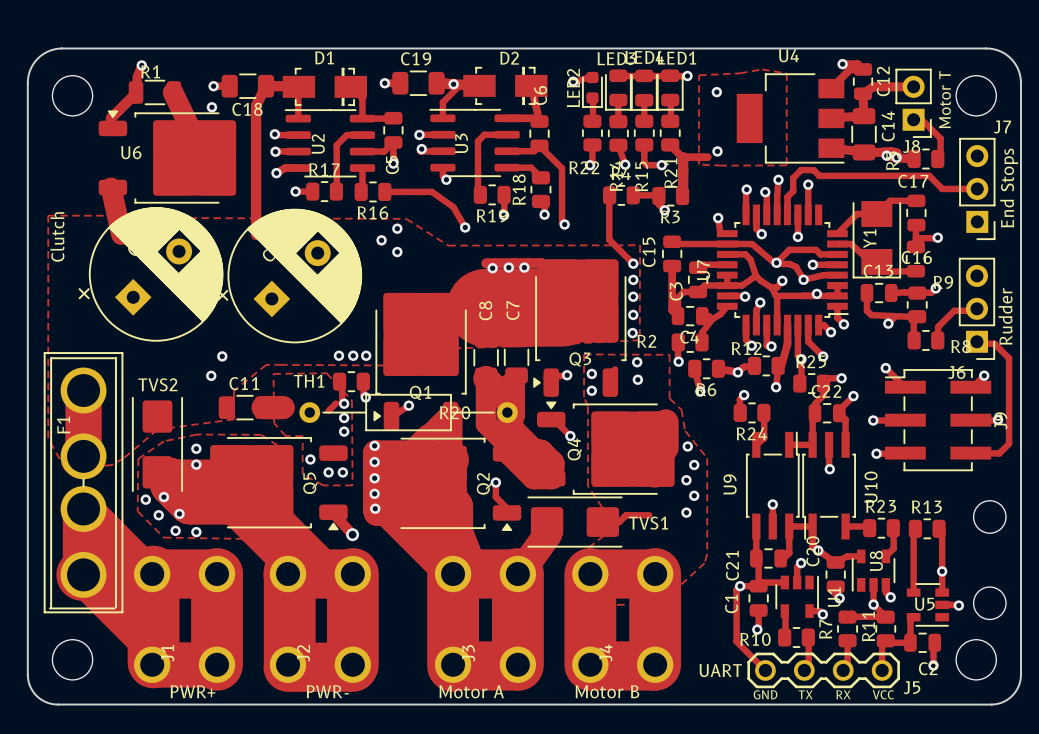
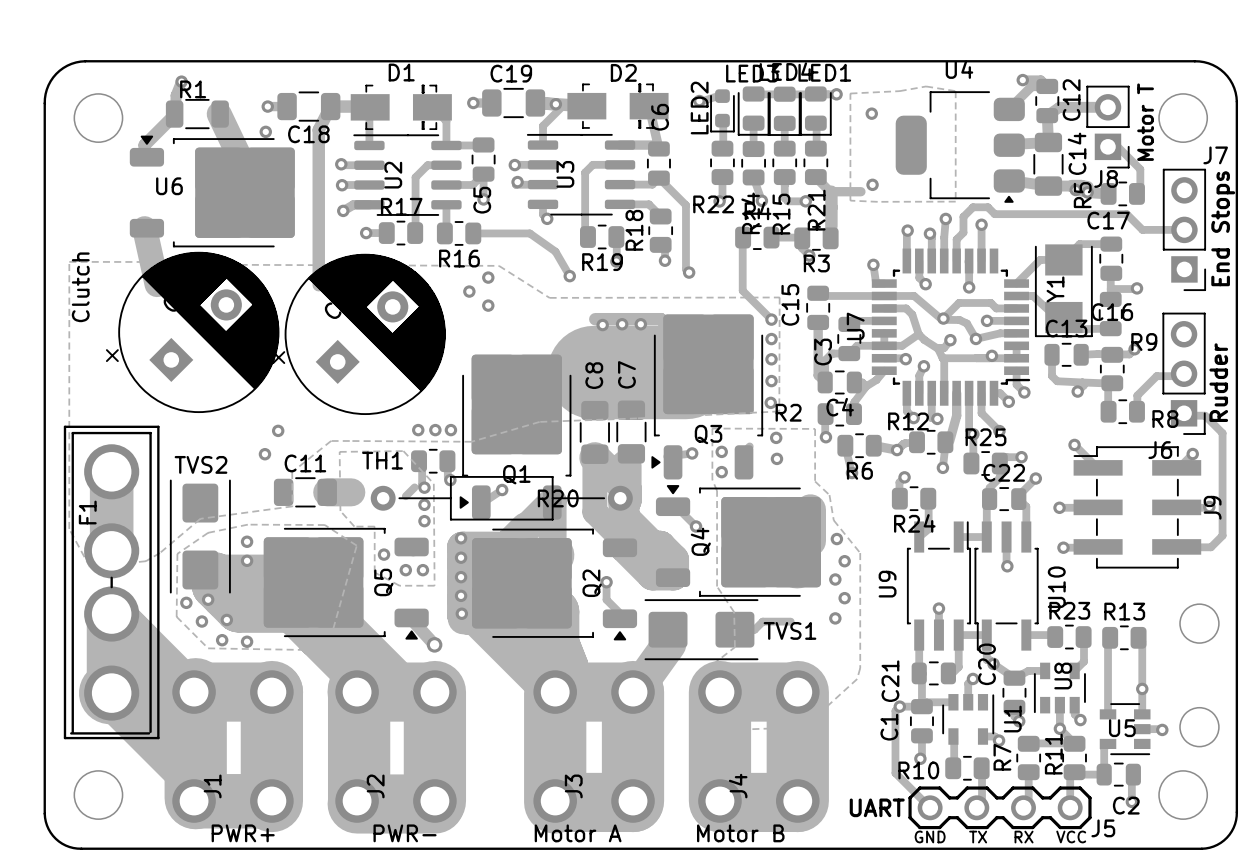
U4 footprint: [736, 73, 845, 164] -> [895, 91, 1025, 203]

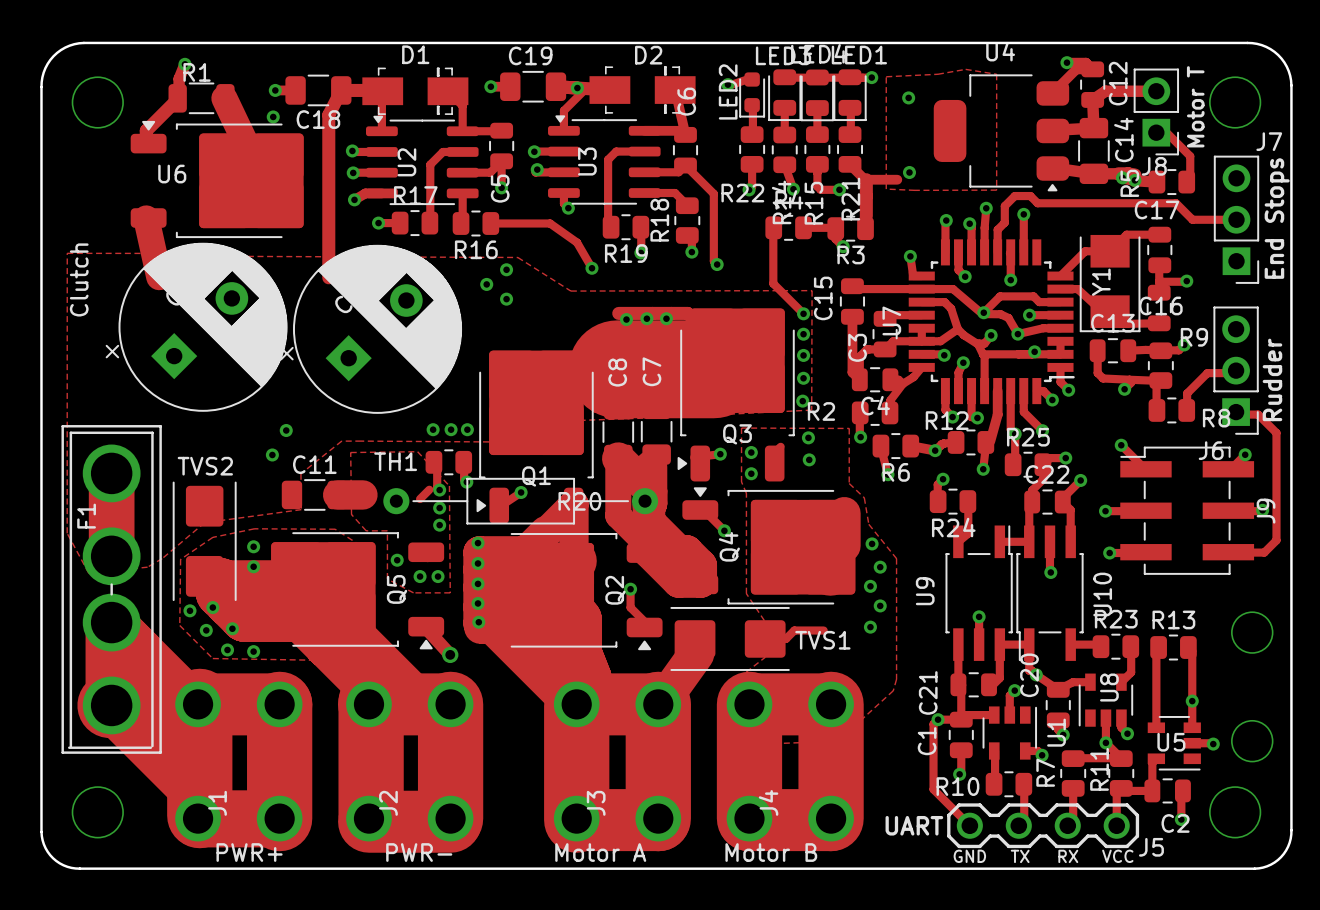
U3 footprint: [526, 133, 636, 216] -> [548, 115, 661, 205]
U2 footprint: [353, 134, 462, 216] -> [365, 115, 479, 206]

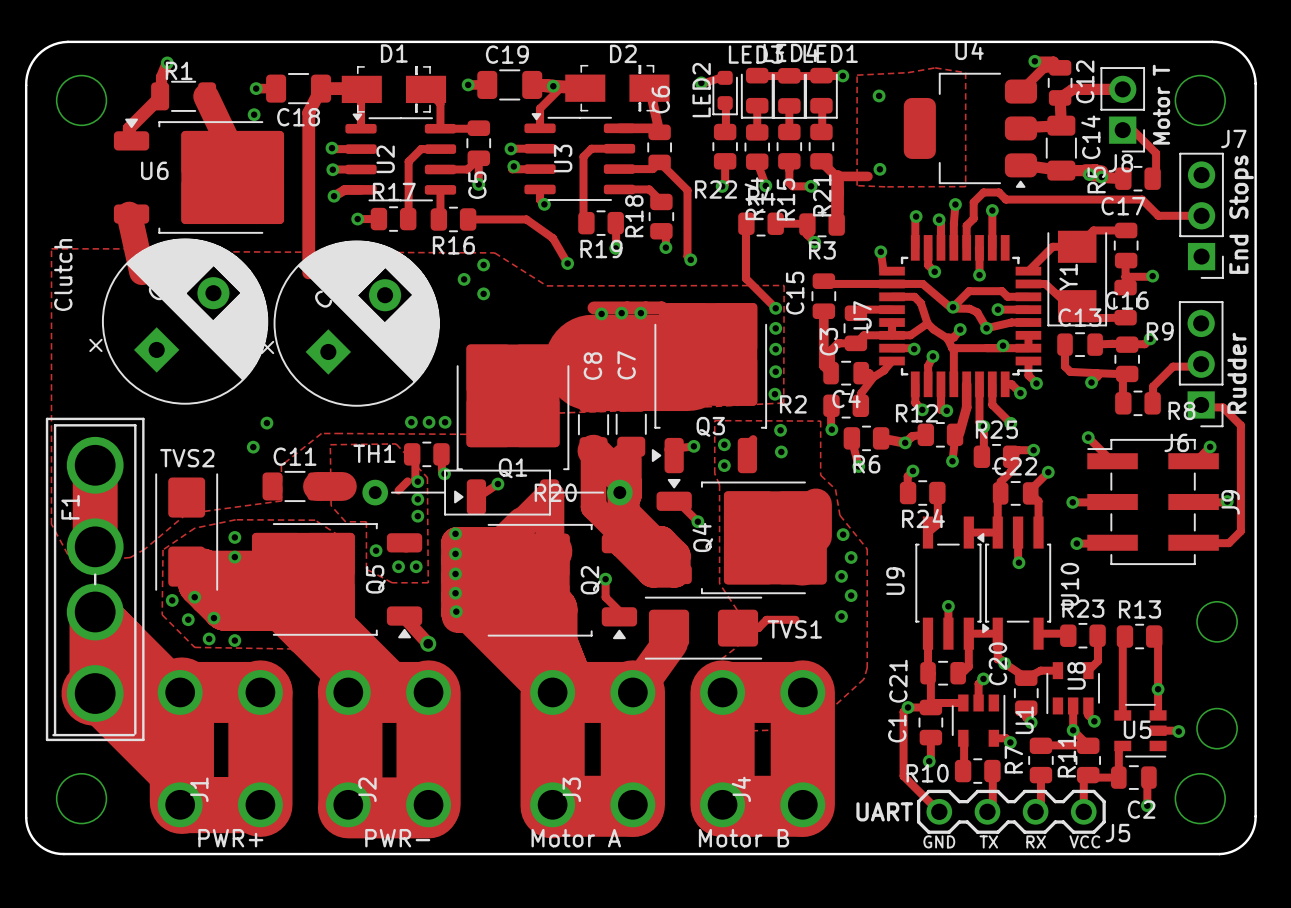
U9 footprint: [945, 525, 1013, 661] -> [915, 516, 985, 650]
U10 footprint: [1016, 525, 1084, 662] -> [982, 516, 1052, 650]

